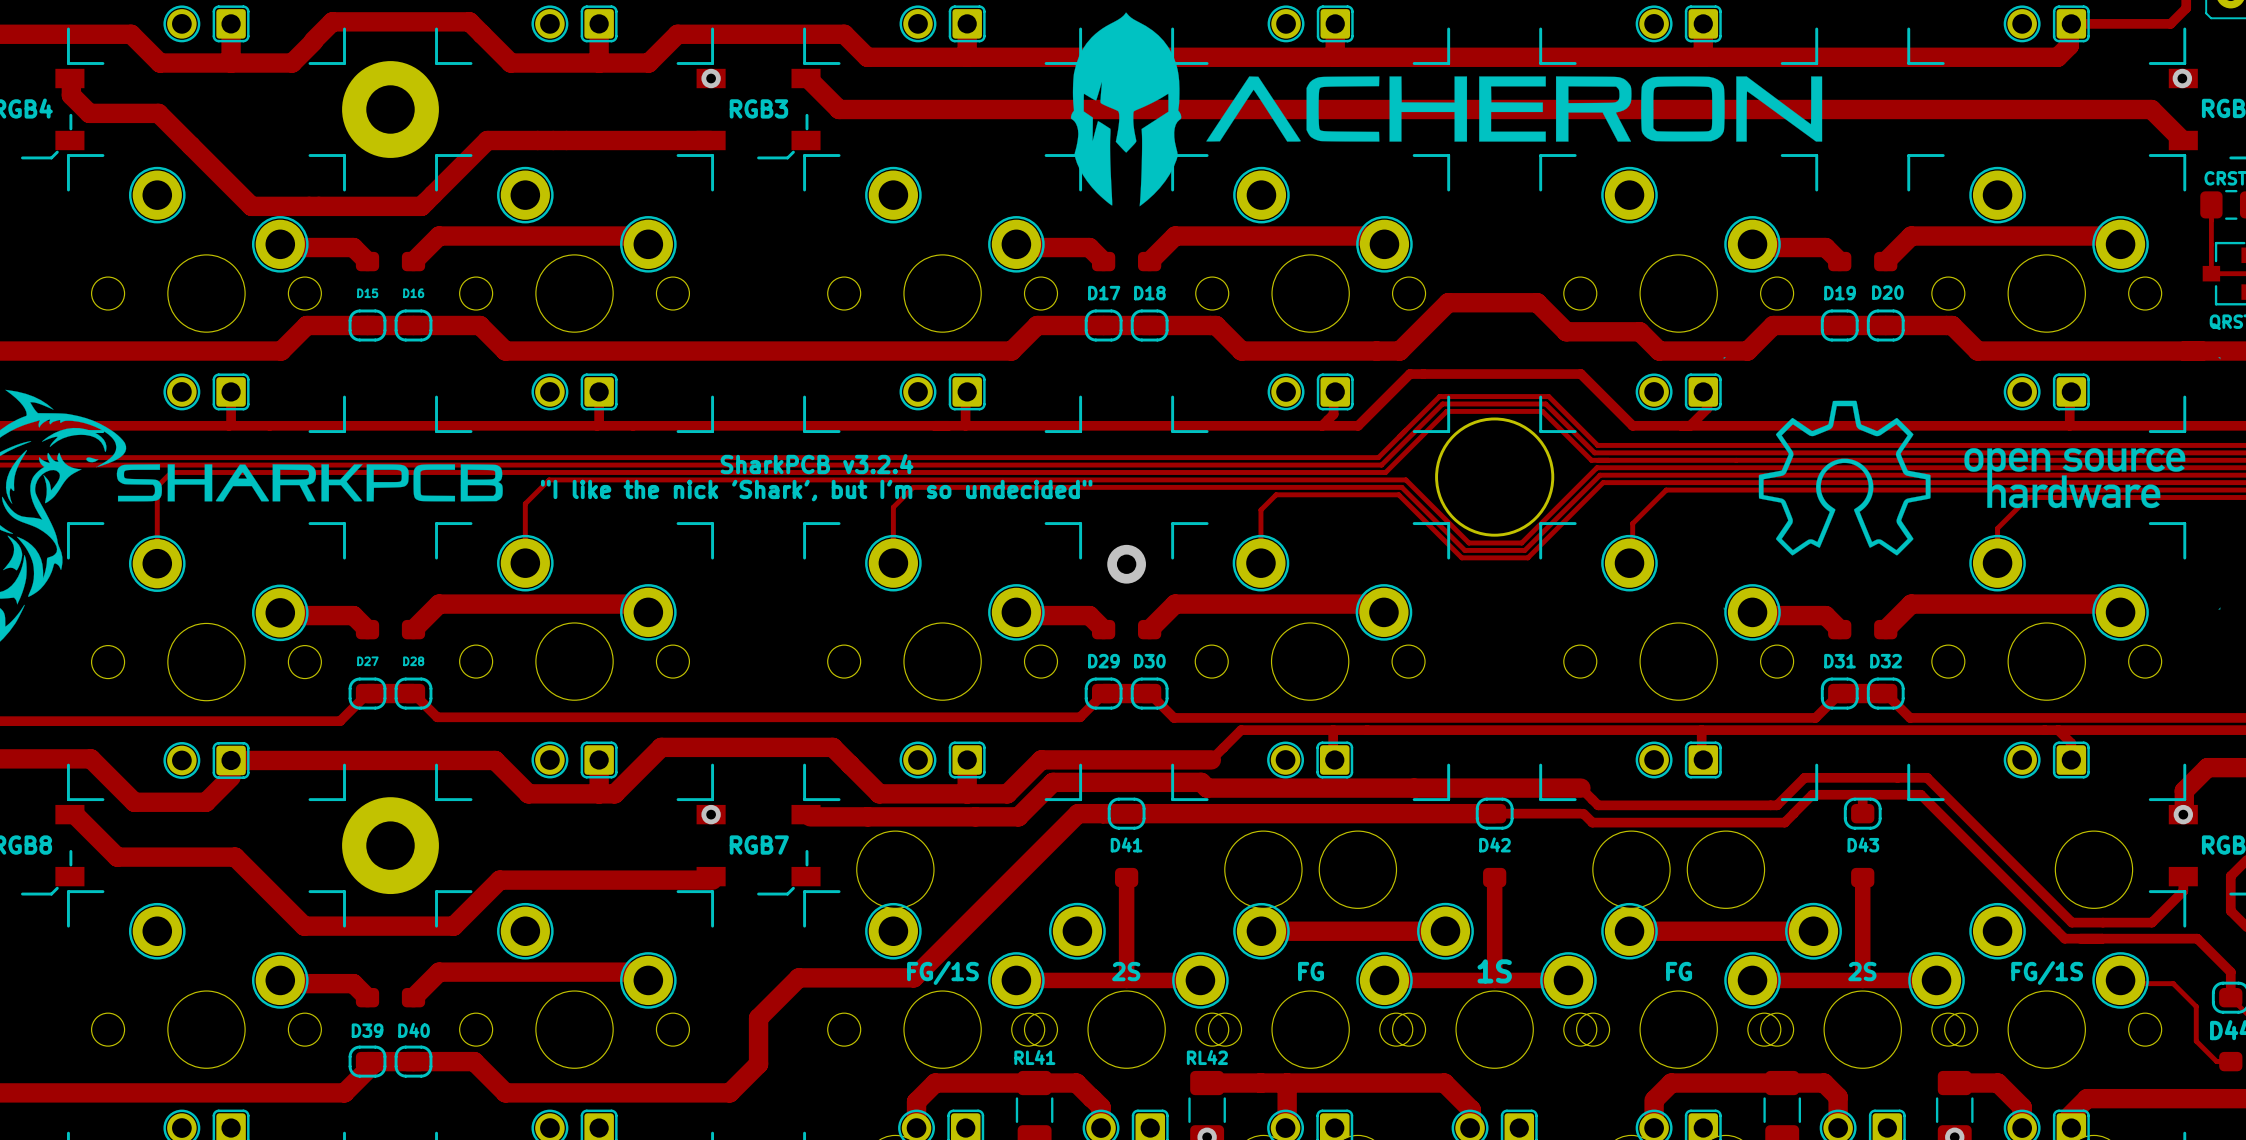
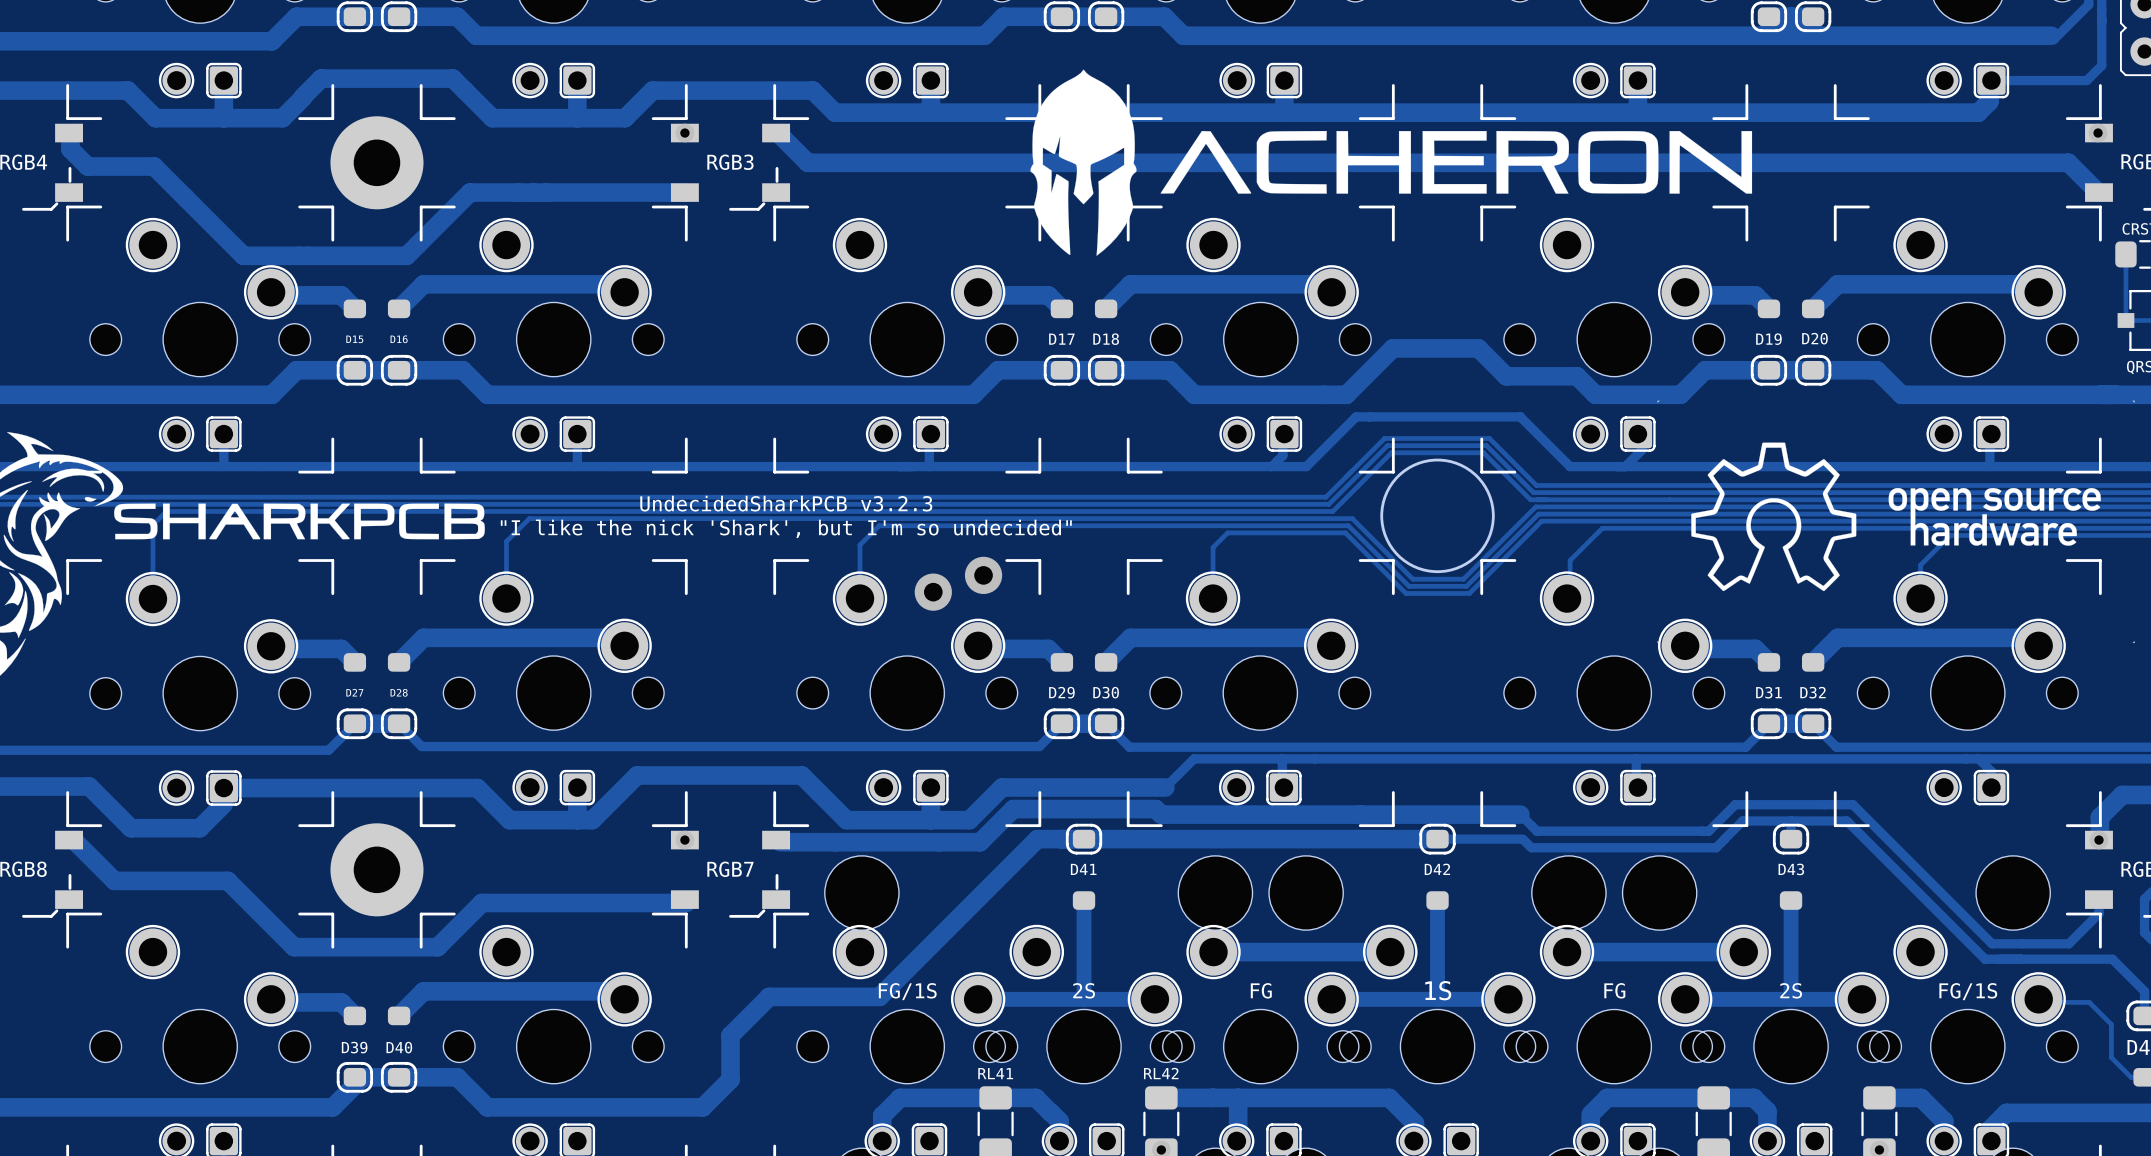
text: SharkPCB v3.2.4 (817, 464) -> UndecidedSharkPCB v3.2.3 (786, 503)
via: none -> (983, 575)
via: none -> (933, 592)
via: (1126, 564) -> none

